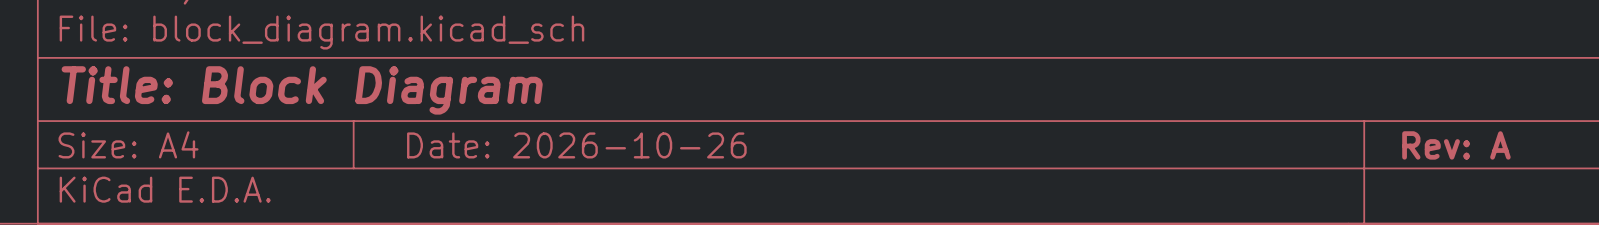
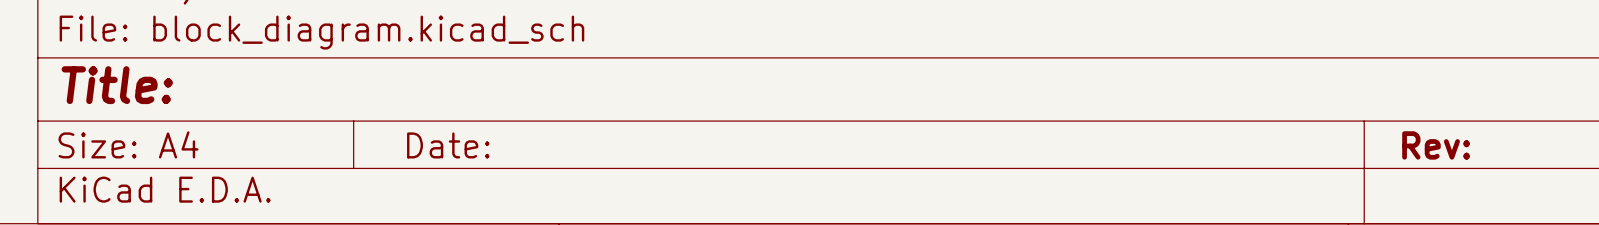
title block: Title: Block Diagram (302, 90) -> Title: (117, 85)
title block: Date: 2026-10-26 (576, 145) -> Date: (448, 145)
title block: Rev: A (1456, 145) -> Rev: (1436, 145)

